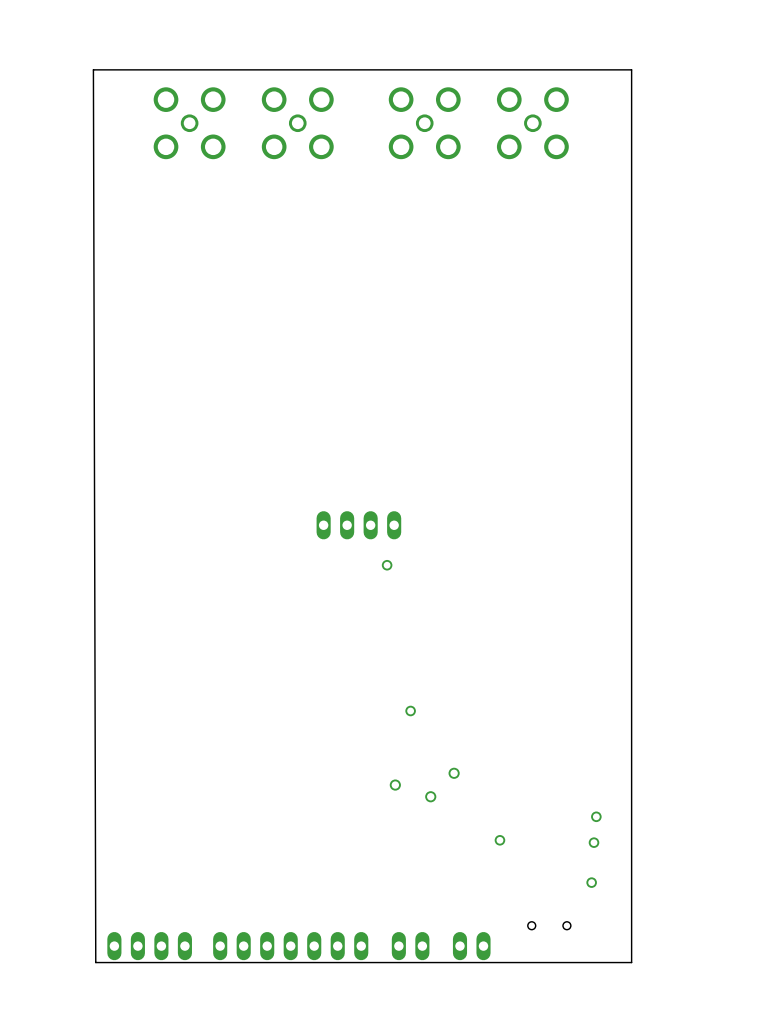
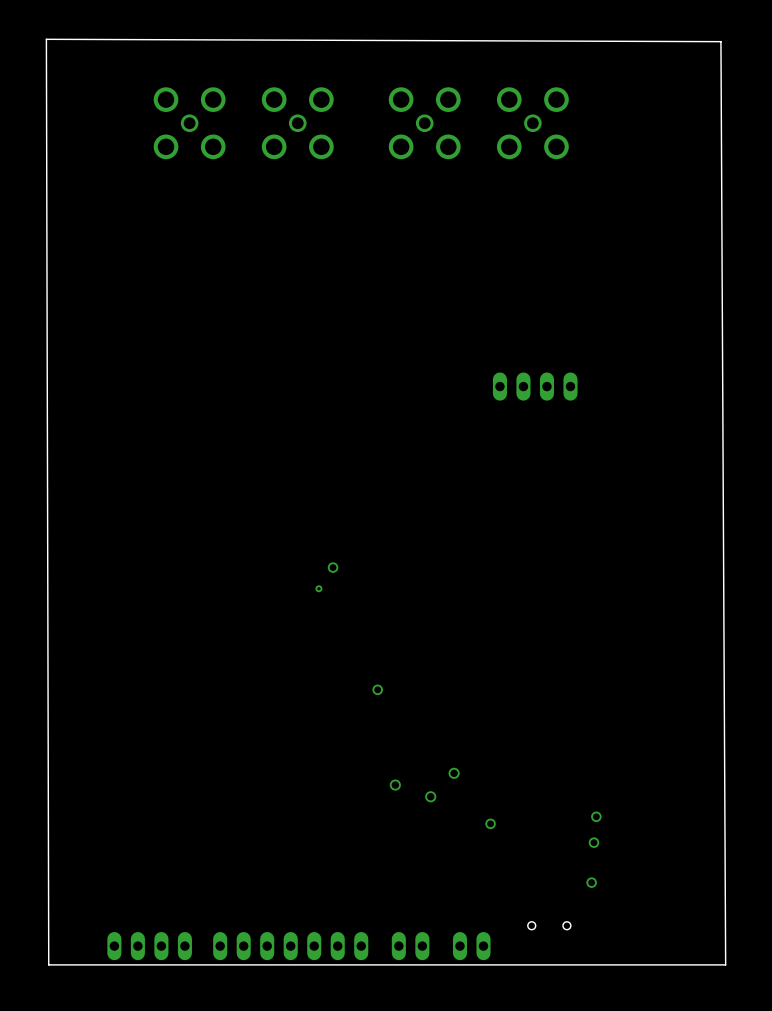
board edge: (631, 69) (93, 69) (95, 962) (631, 962) (631, 69) -> (46, 39) (720, 41) (725, 964) (48, 964) (46, 39)
part position: (358, 525) -> (535, 386)
part position: (387, 565) -> (333, 567)
via: none -> (318, 588)
part position: (410, 710) -> (377, 689)
part position: (499, 840) -> (490, 823)

